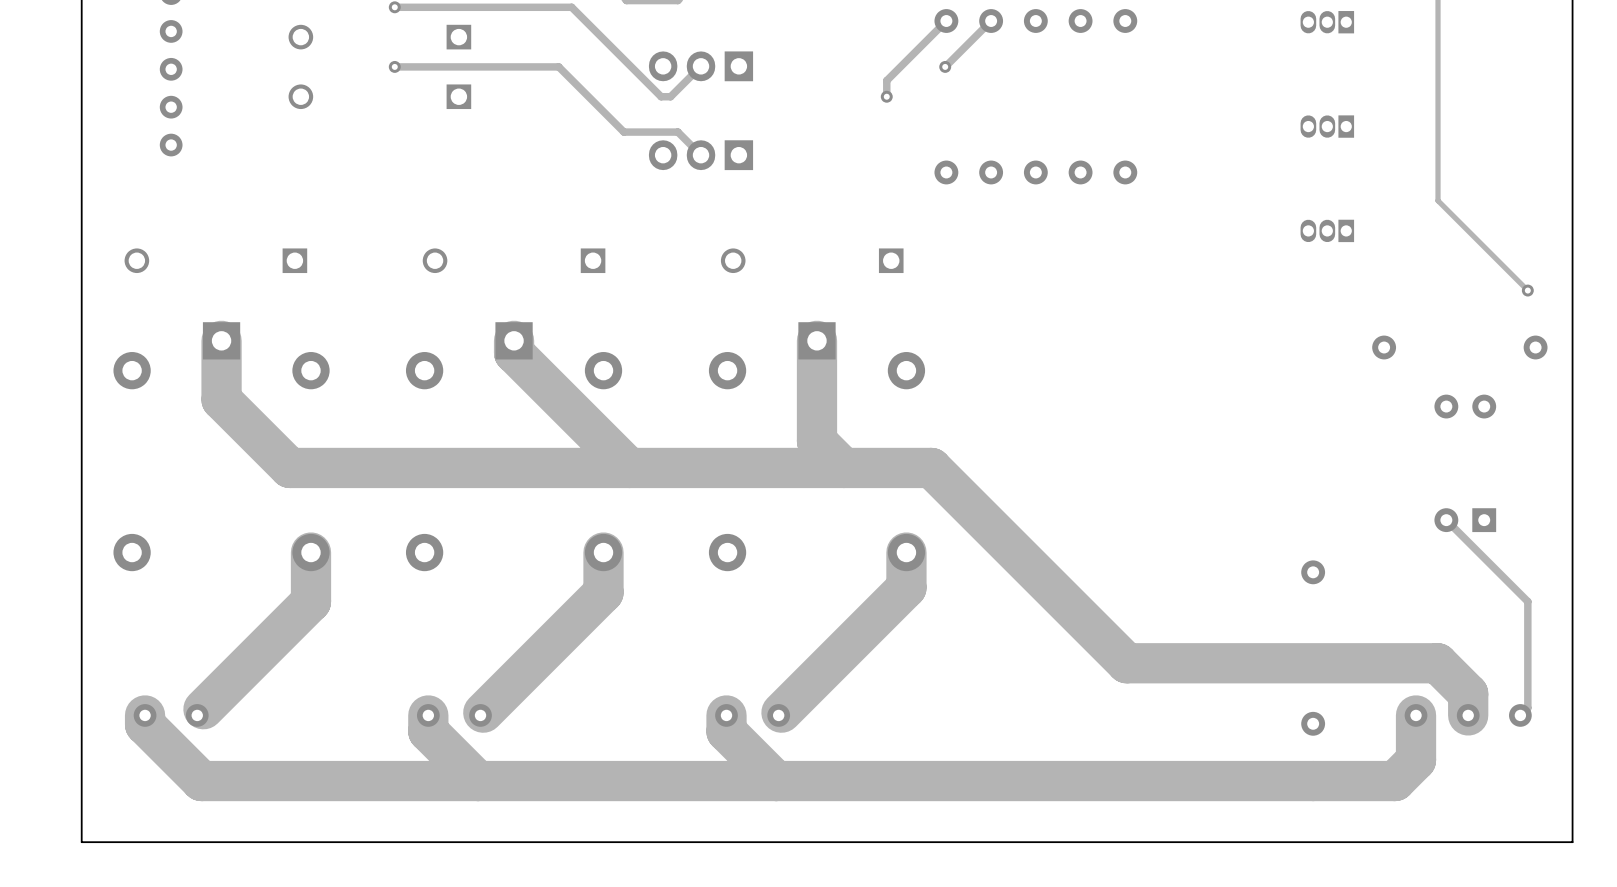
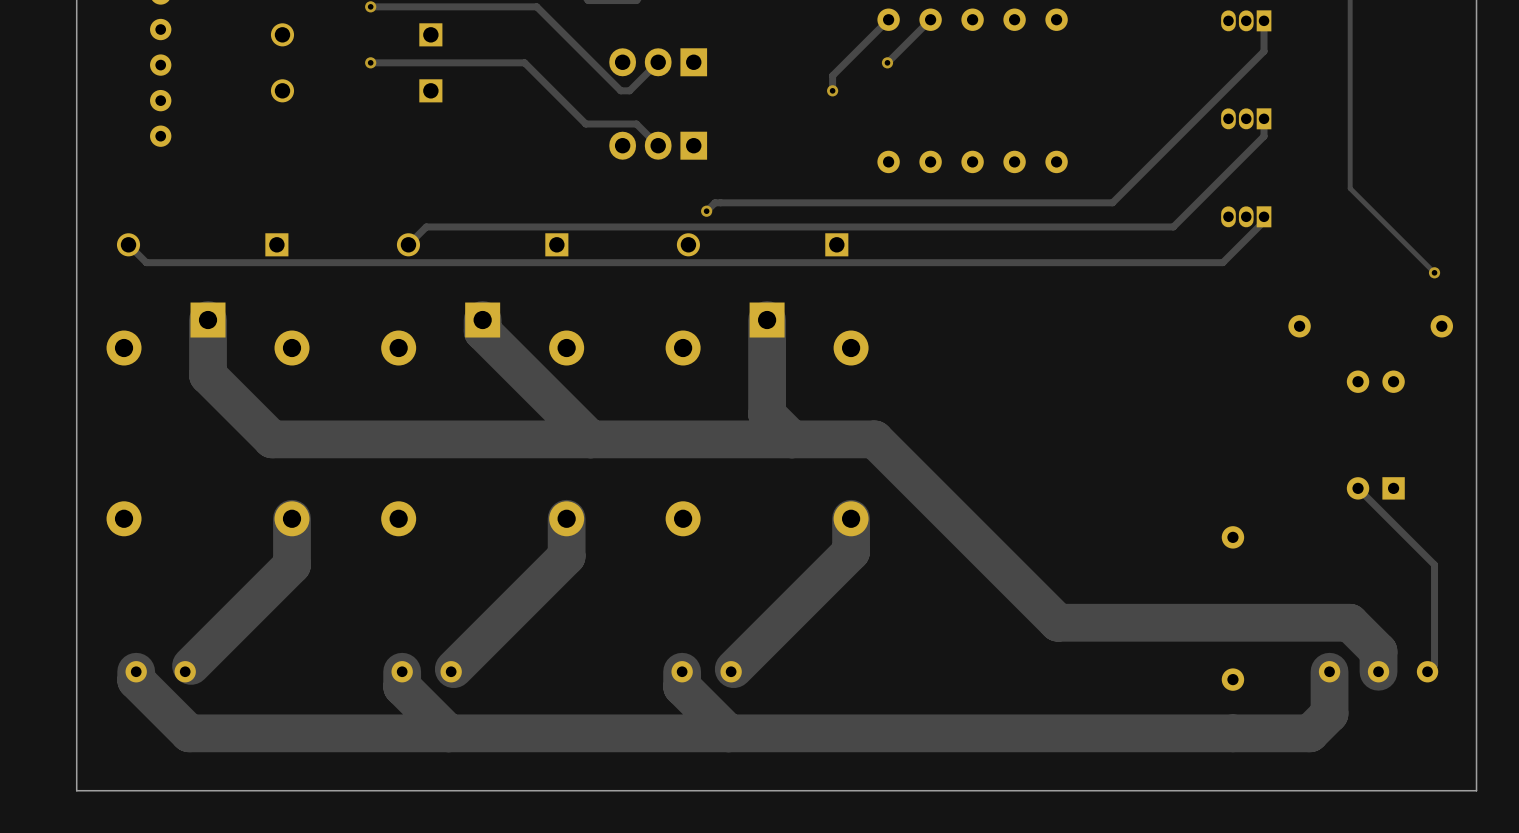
track: none -> (1264, 20) (1264, 51) (1112, 202) (715, 202) (706, 211)
track: none -> (1264, 118) (1264, 136) (1173, 226) (426, 226) (408, 244)
via: none -> (706, 211)
track: none -> (1264, 216) (1264, 221) (1222, 262) (146, 262) (128, 244)

